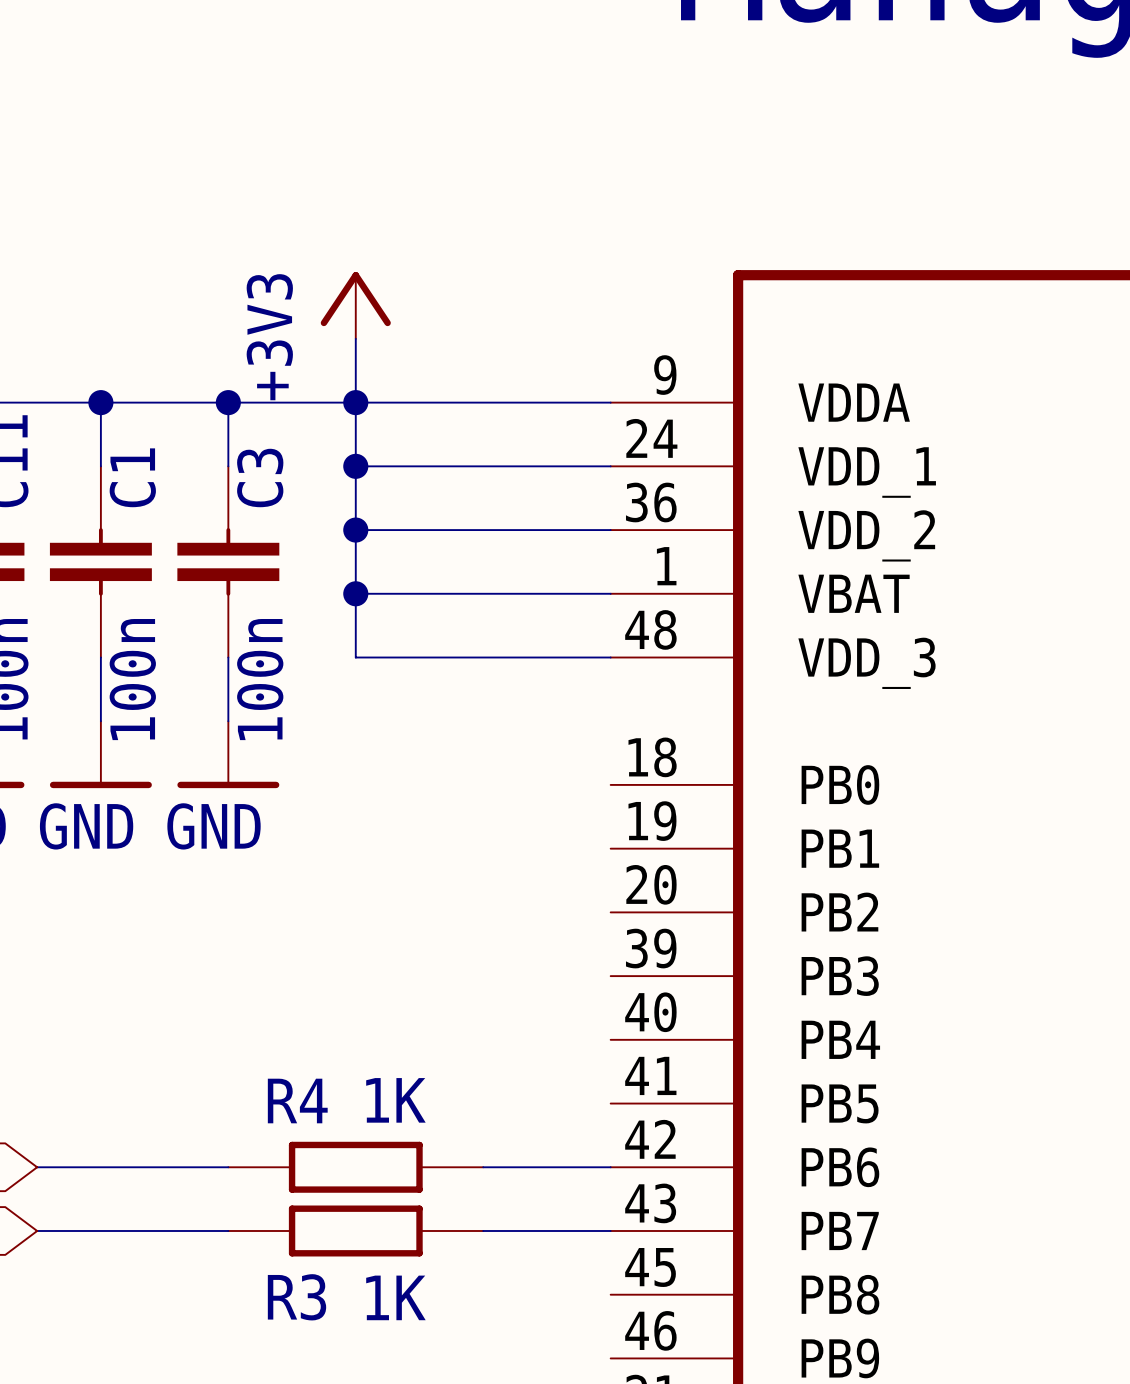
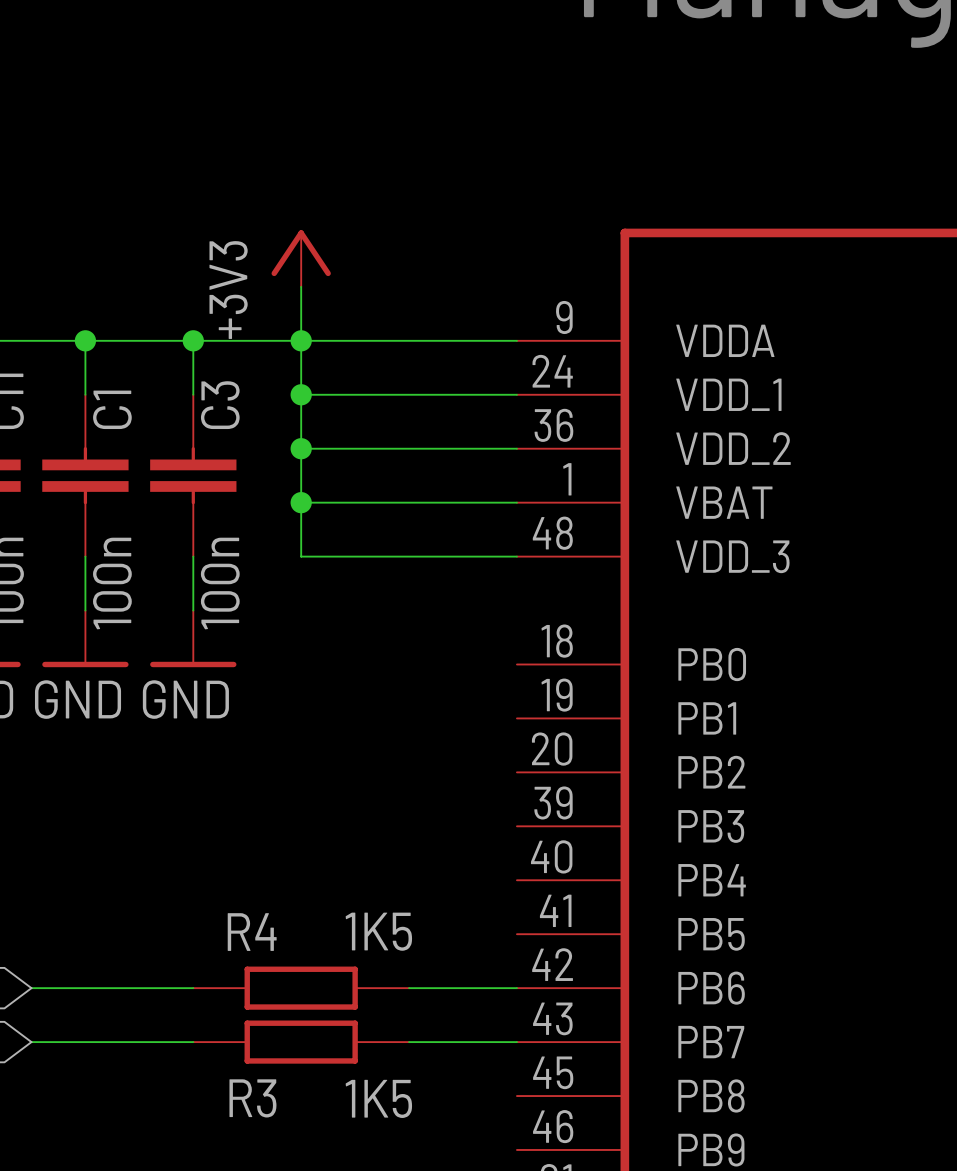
R4 value: 1K (395, 1100) -> 1K5 (378, 931)
R3 value: 1K (395, 1297) -> 1K5 (378, 1098)

